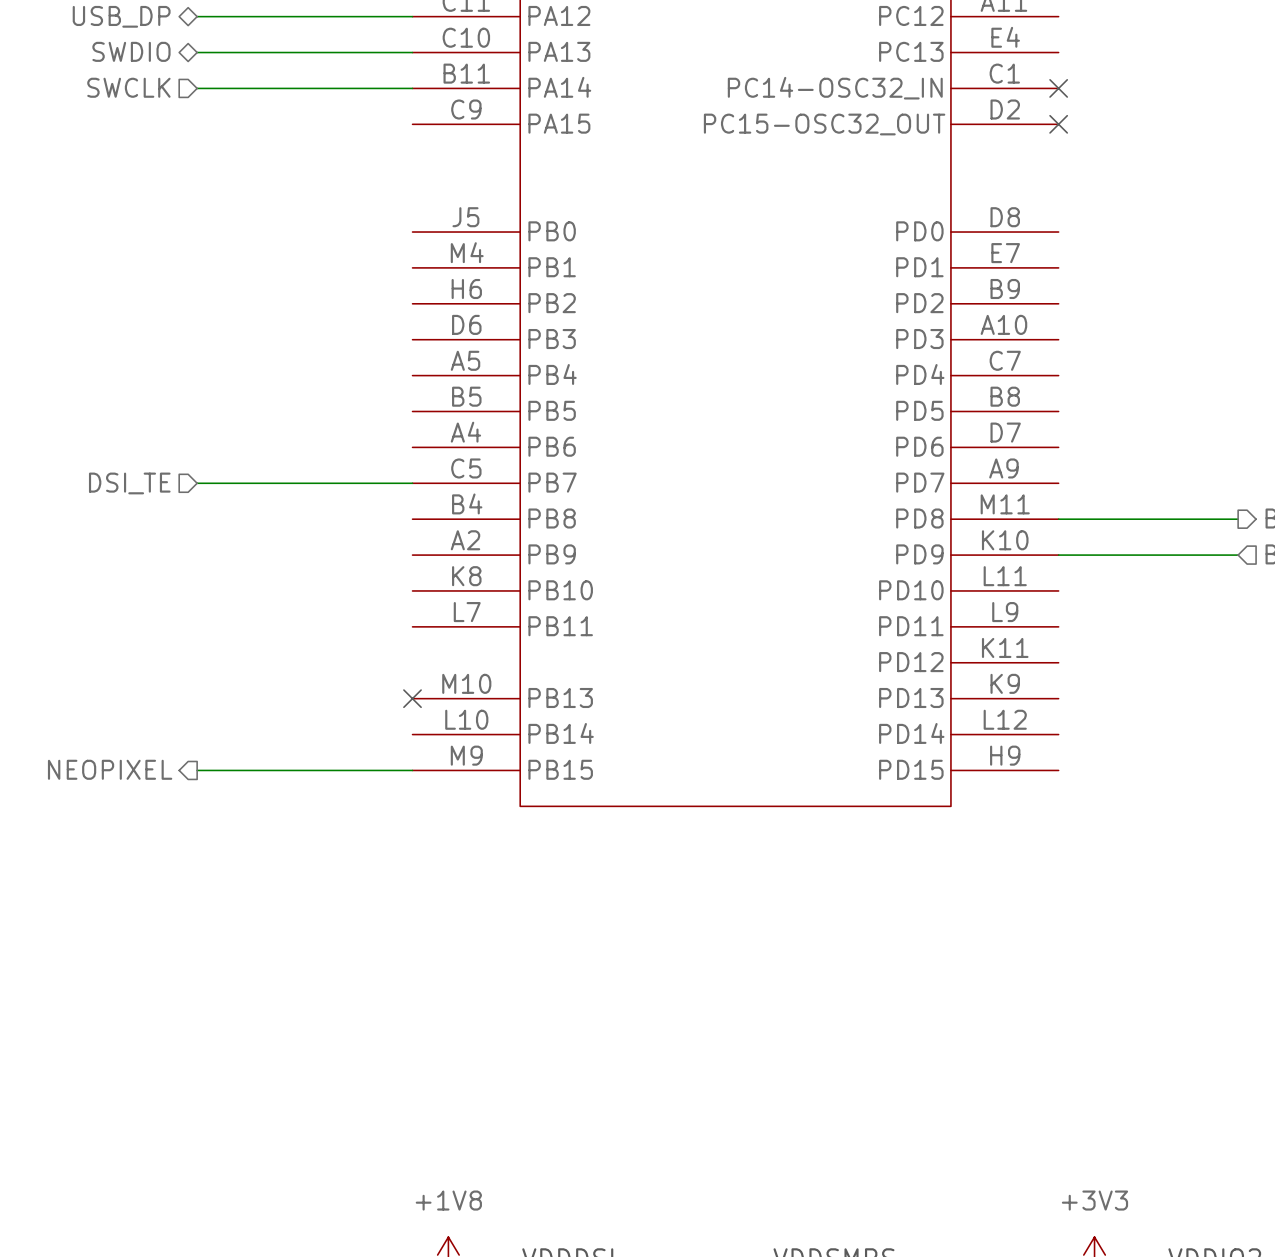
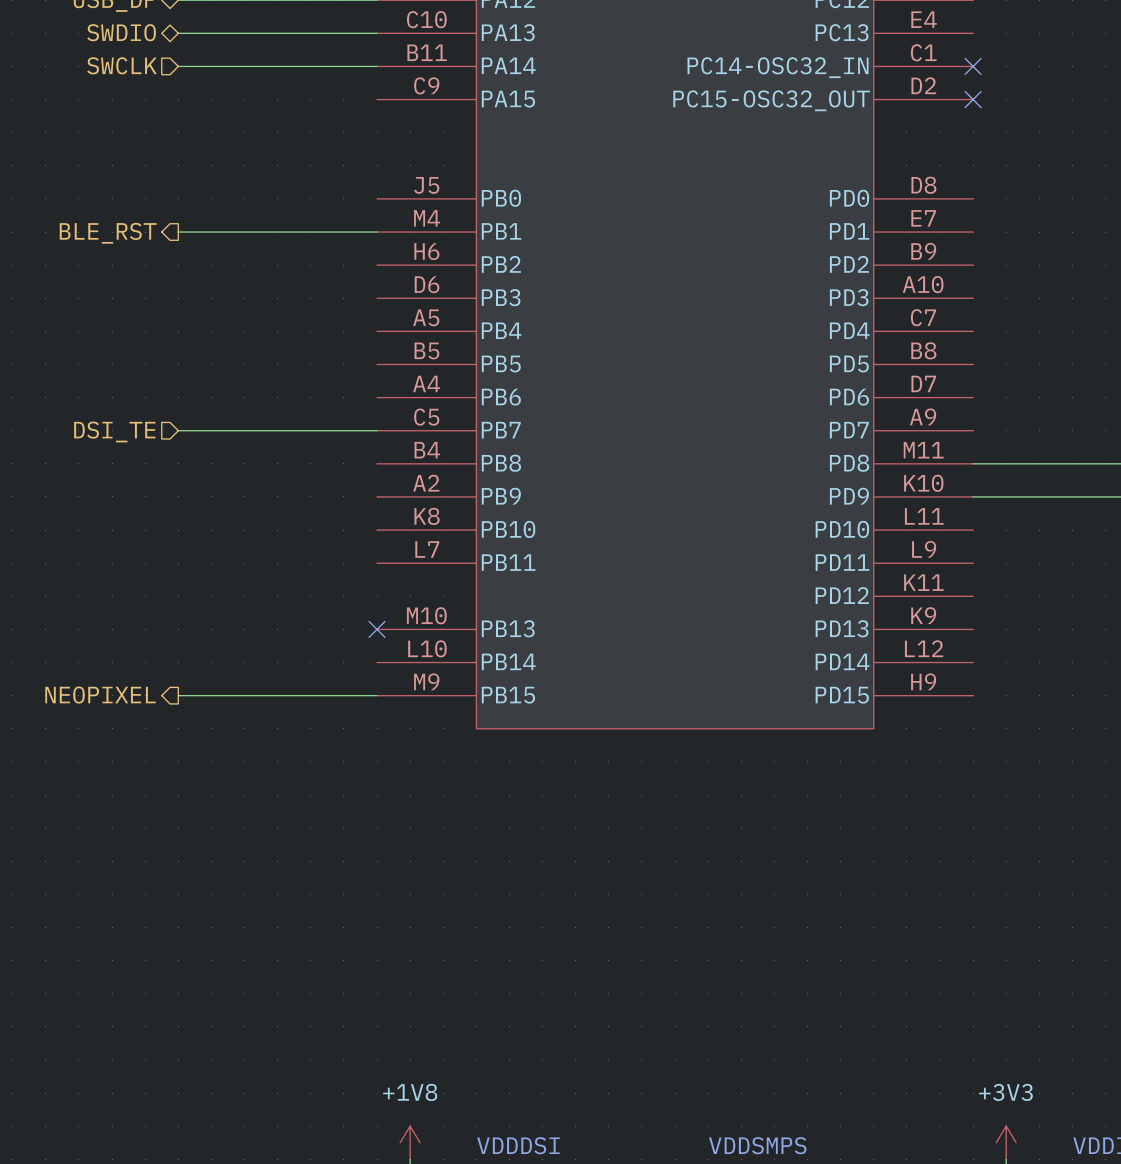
wire: none -> (178, 232) (377, 232)
hierarchical label: none -> BLE_RST (108, 233)

